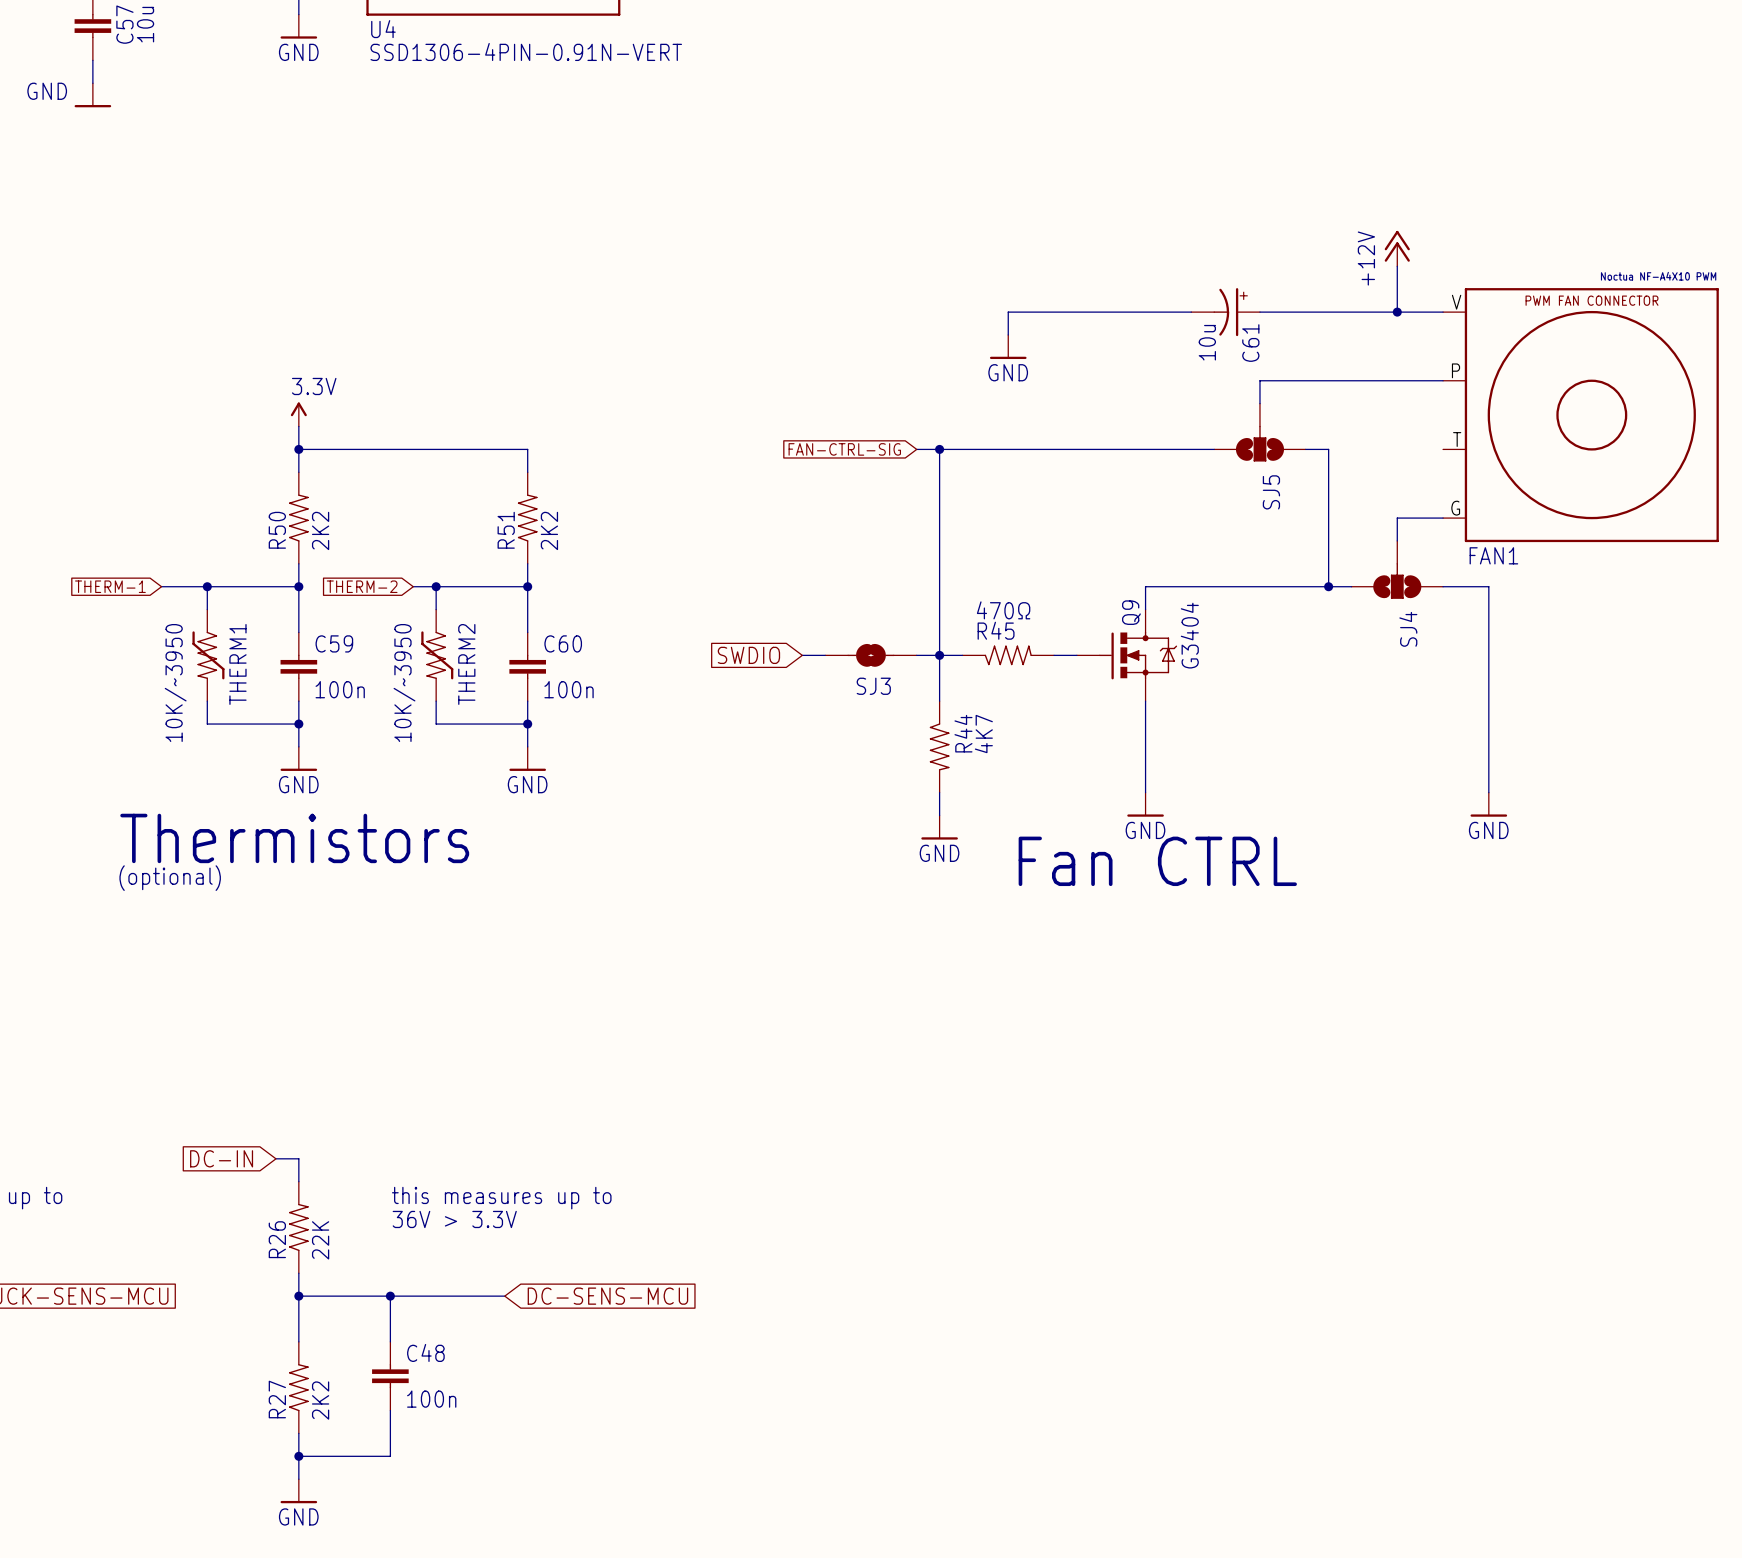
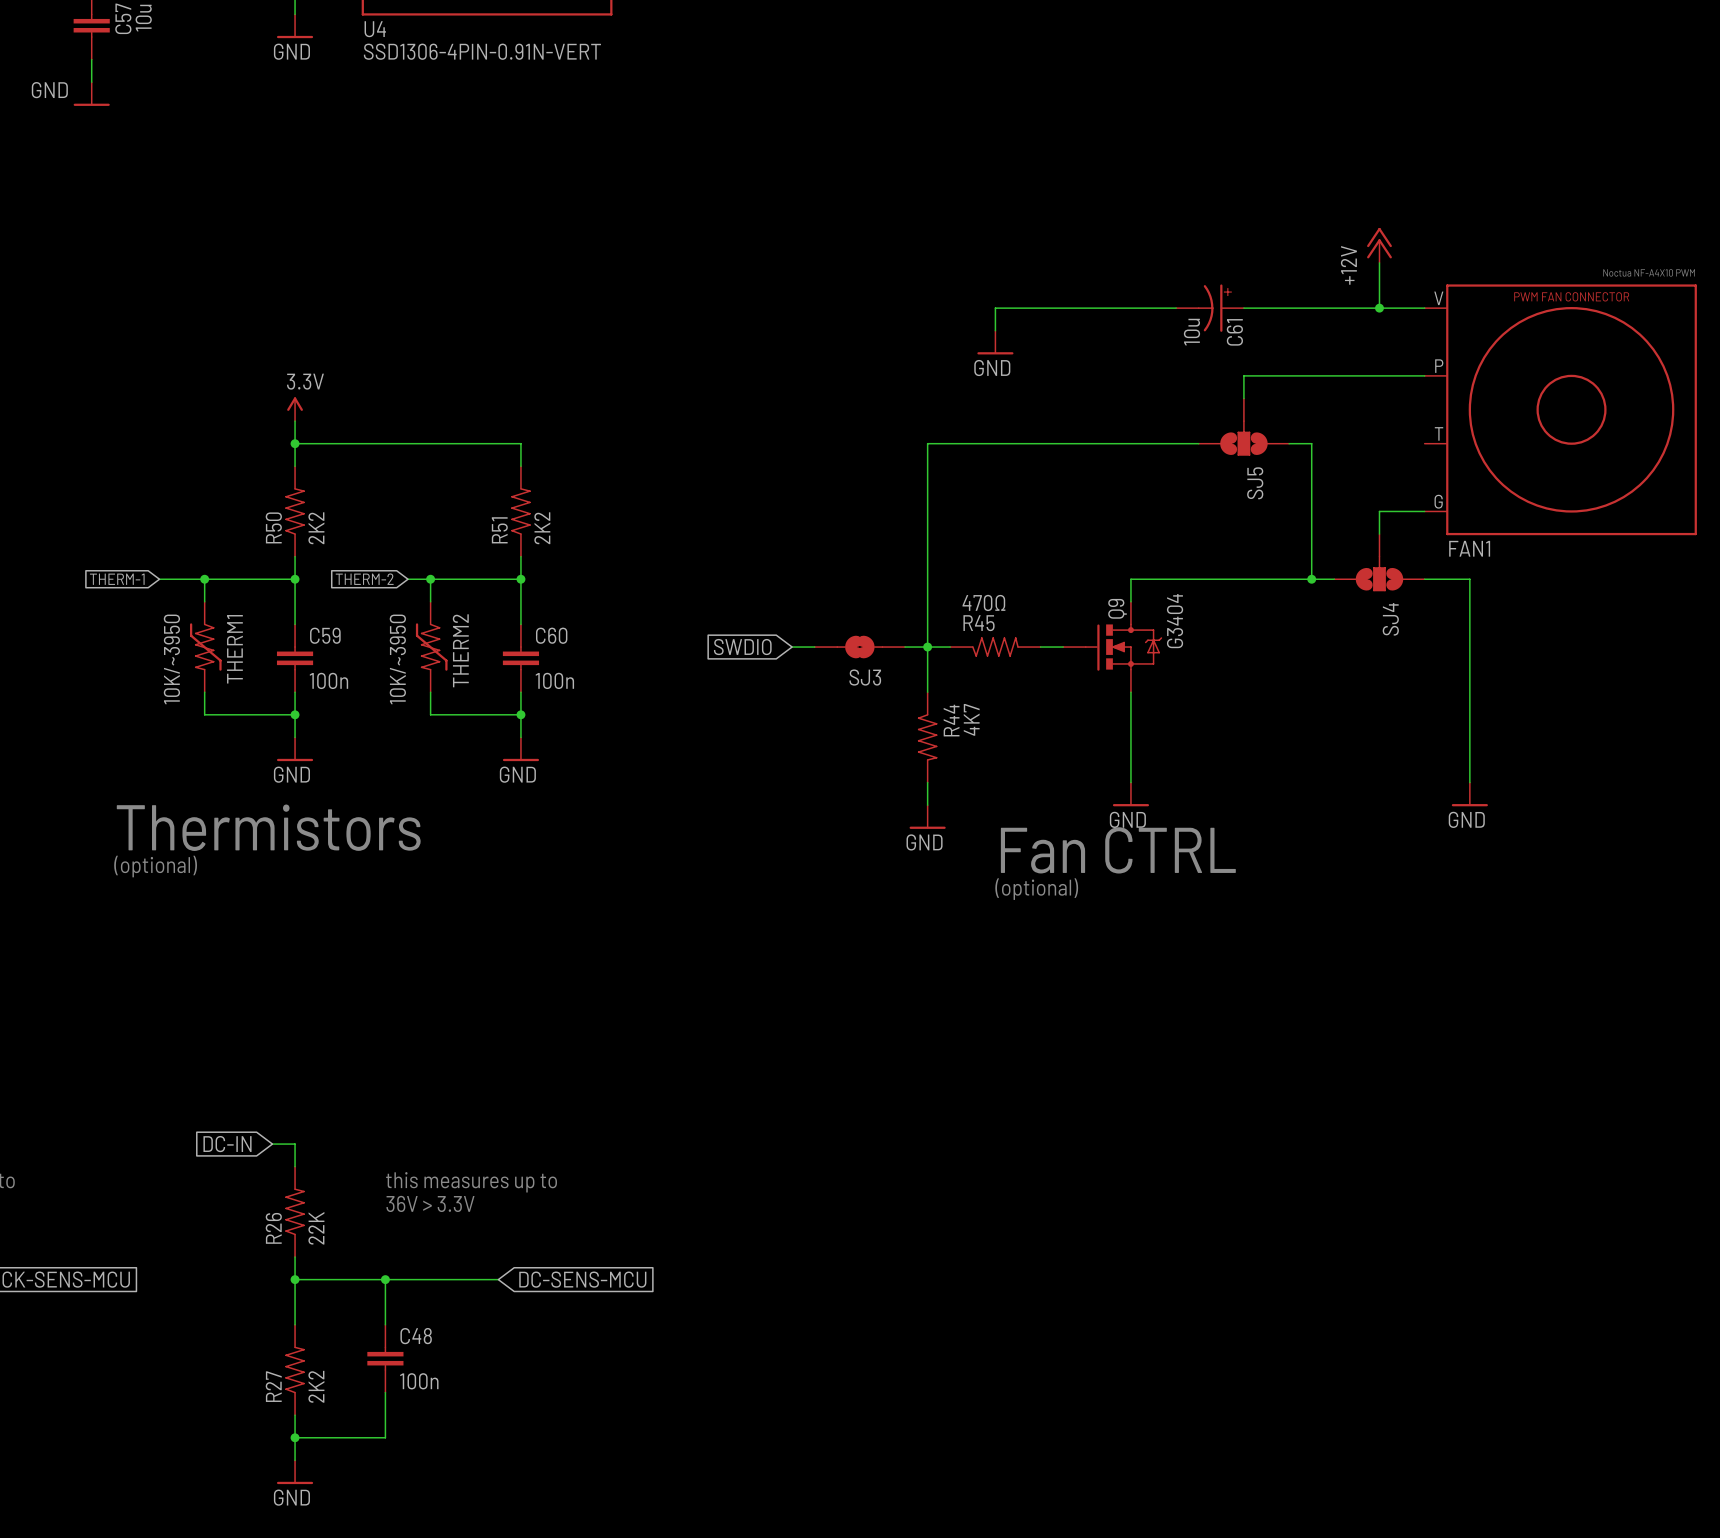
global label: FAN-CTRL-SIG (844, 449) -> none
wire: (916, 449) (939, 449) -> none
junction: (939, 449) -> none
text: none -> (optional) (1036, 889)

